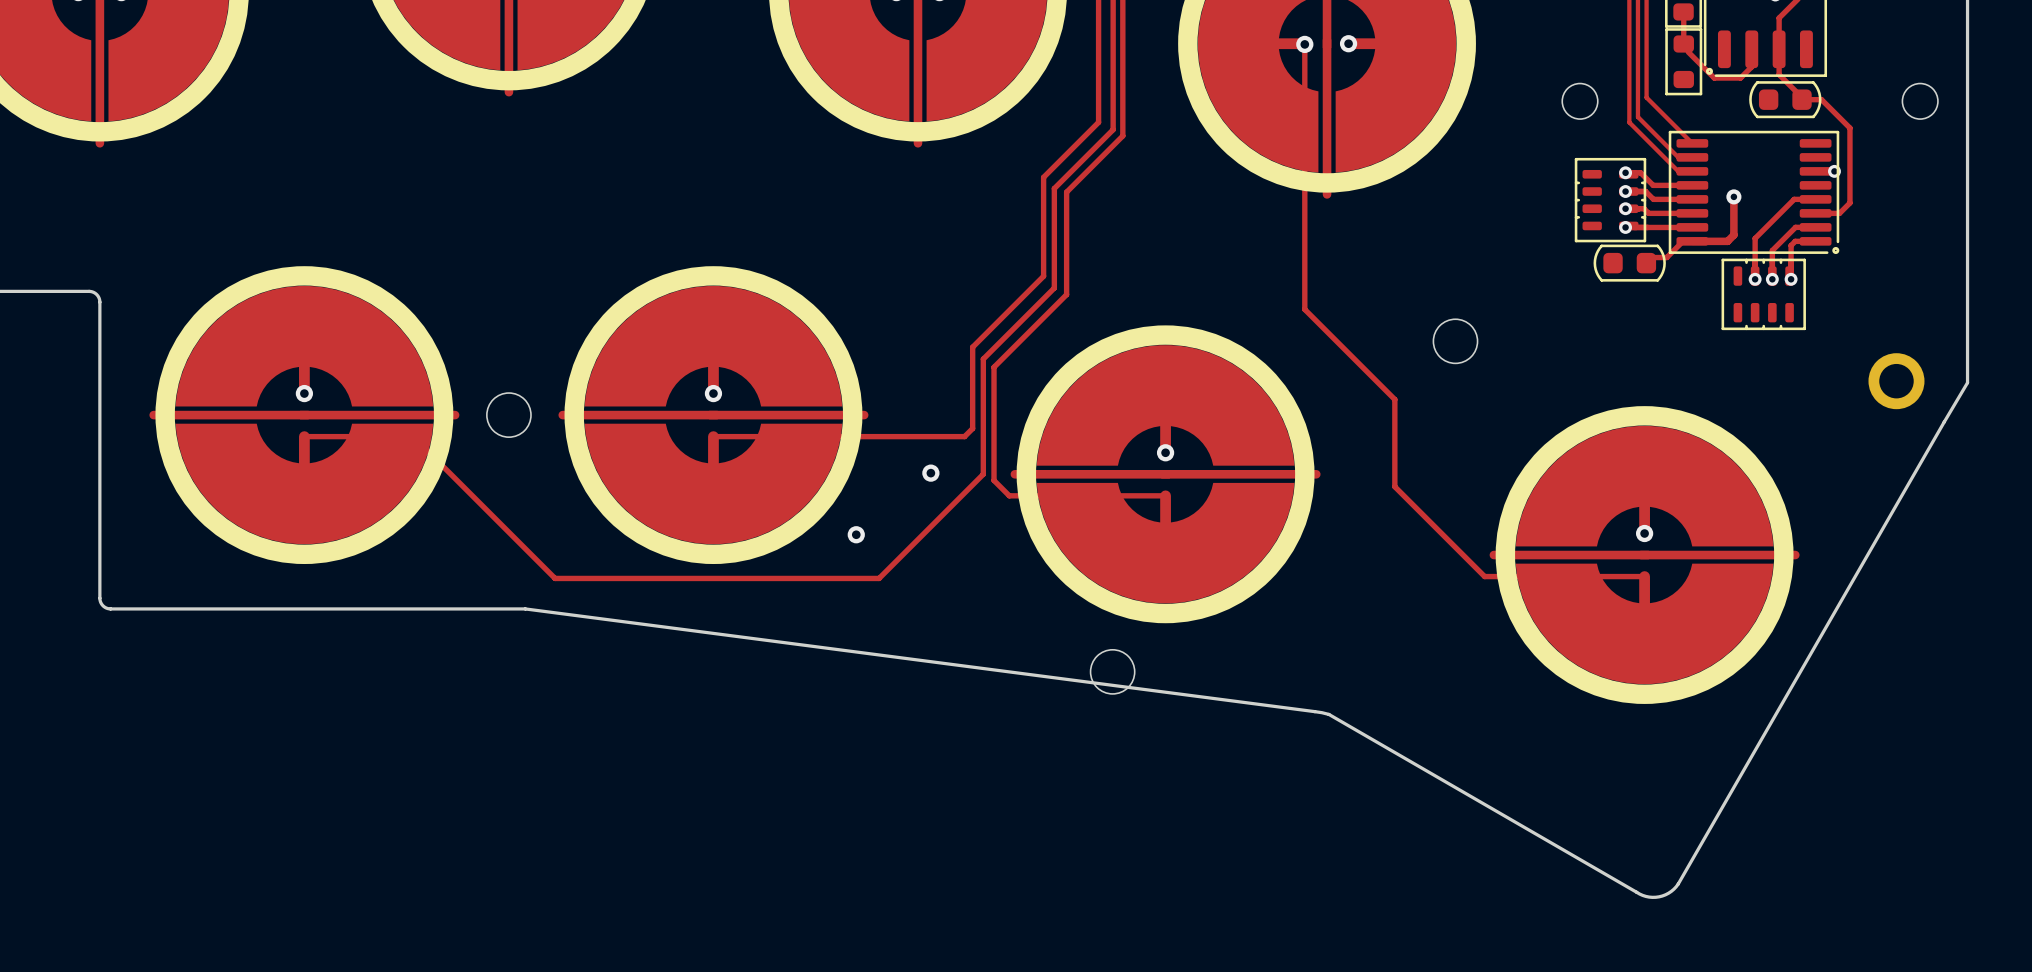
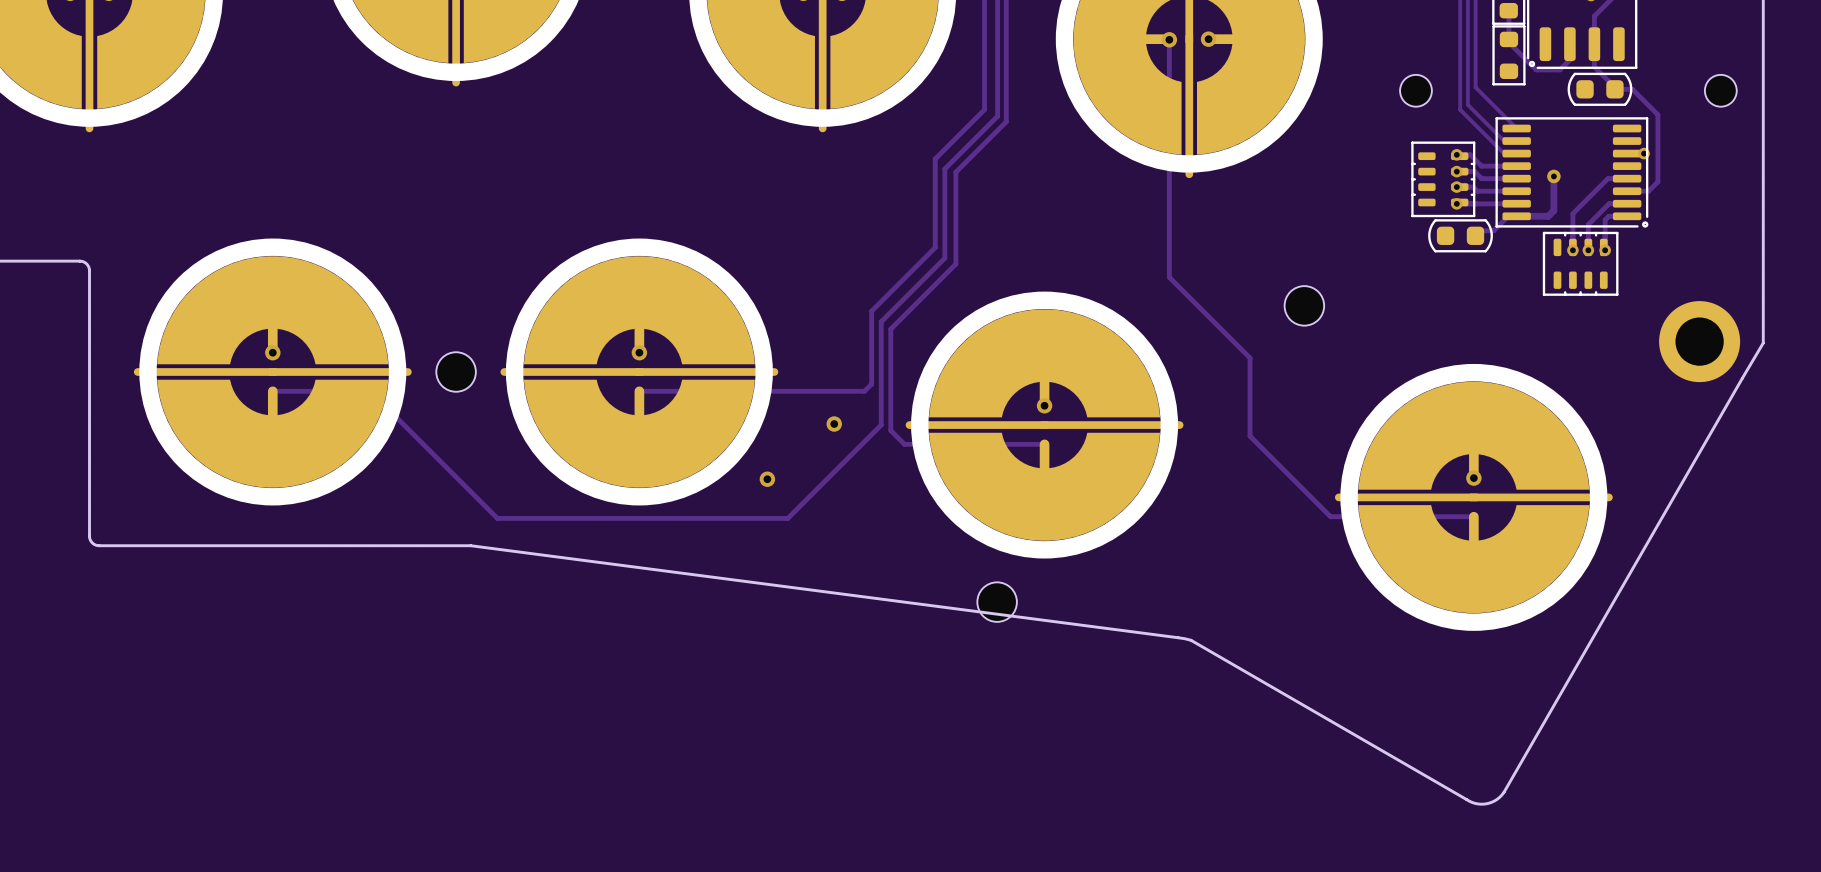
part footprint: [1868, 353, 1925, 410] -> [1659, 301, 1741, 383]

